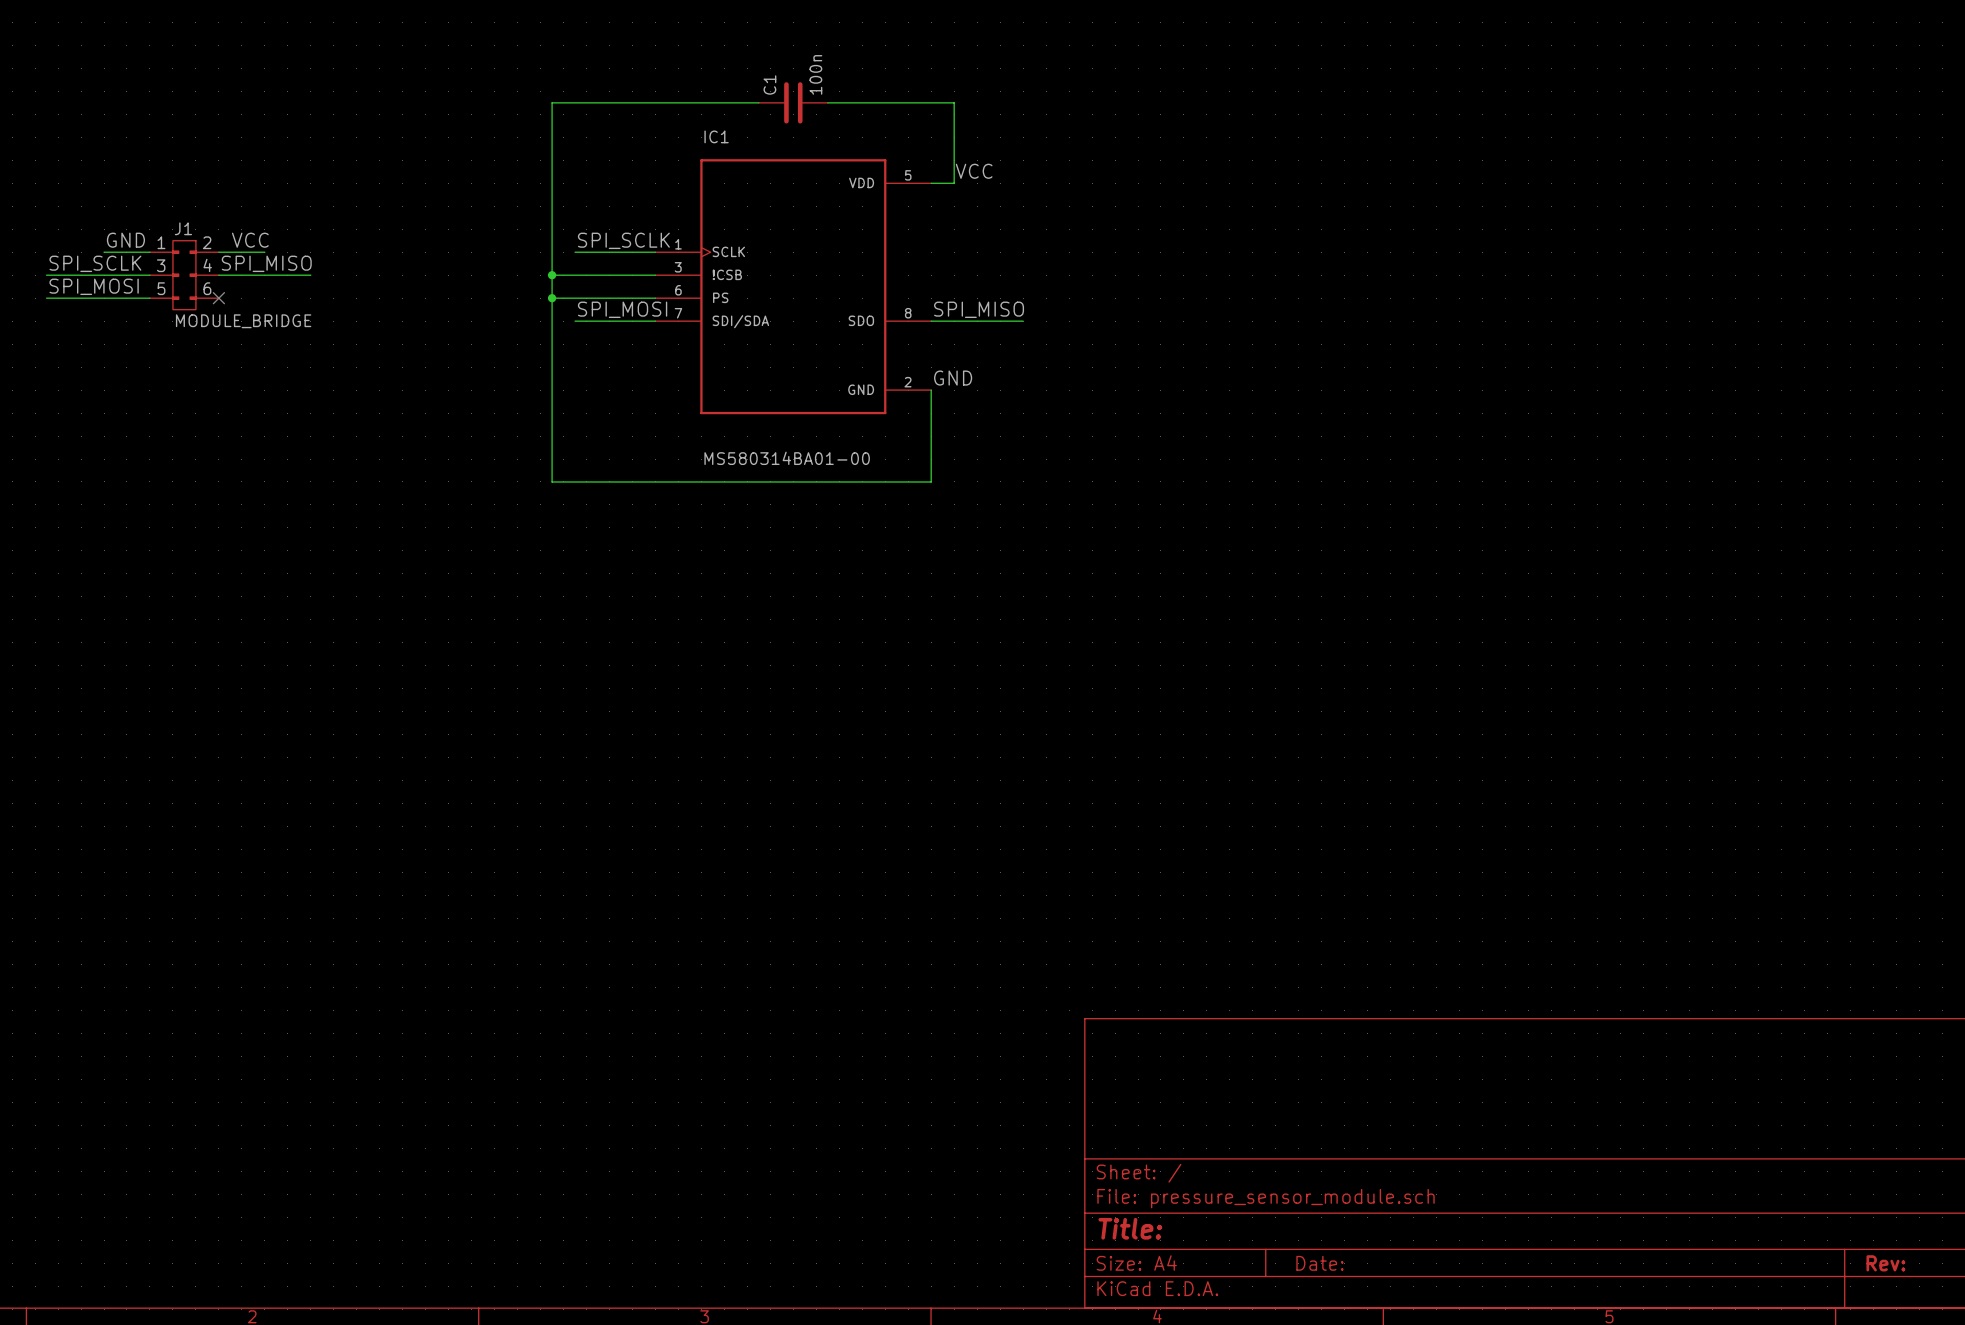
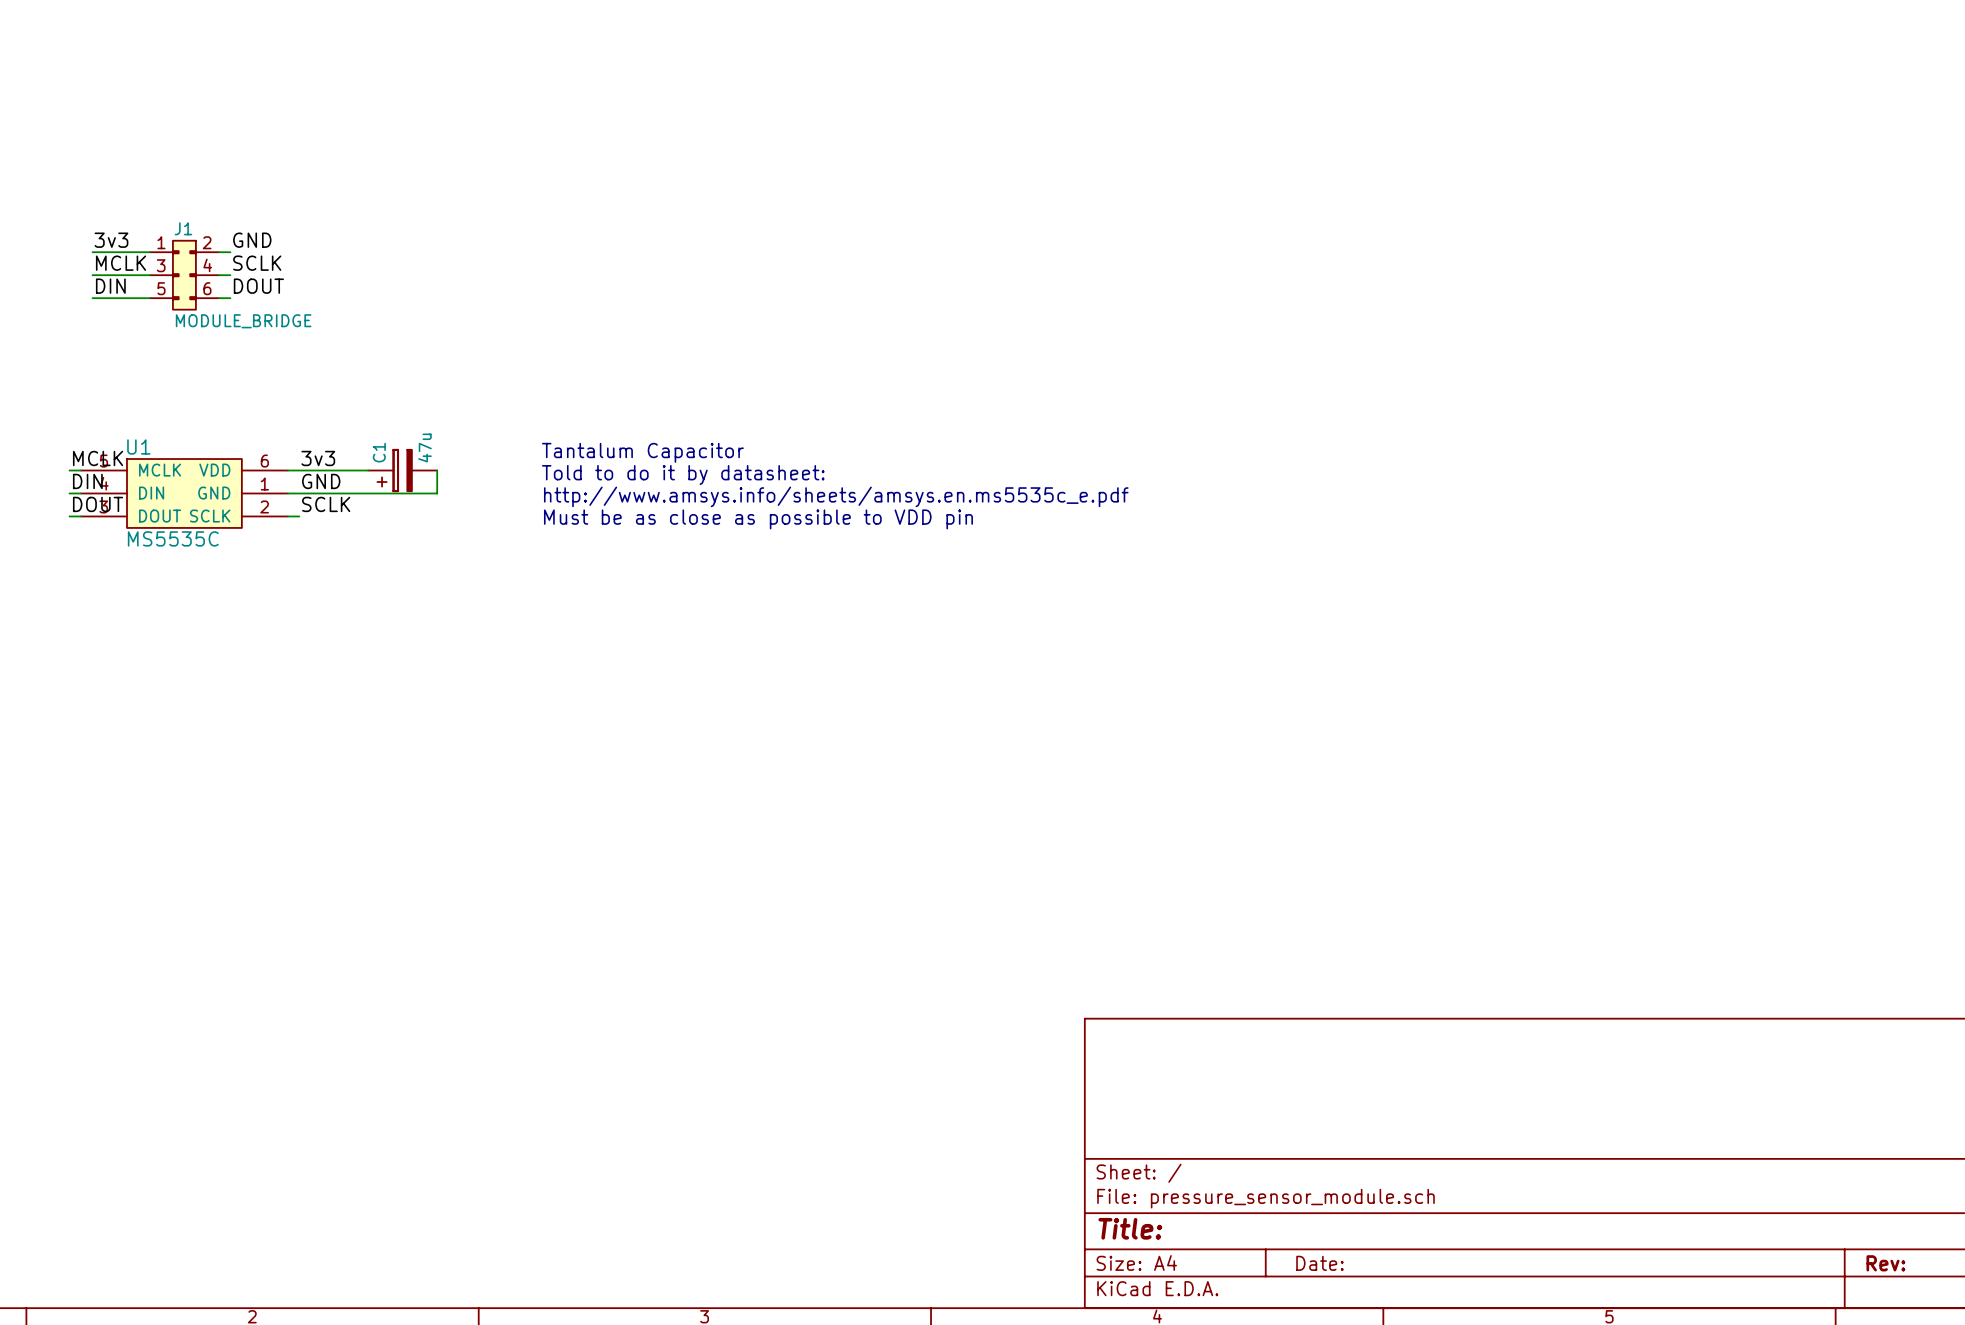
C1 value: 100n (815, 74) -> 47u (425, 447)
C1 symbol: [758, 82, 828, 124] -> [368, 449, 438, 492]
wire: (758, 102) (552, 102) (552, 481) (931, 481) (931, 390) -> none
wire: (827, 102) (954, 102) (954, 183) (931, 183) -> none
label: VCC (974, 171) -> none
label: none -> 3v3 (111, 240)
label: GND (125, 240) -> none
label: VCC (250, 240) -> GND (252, 240)
label: SPI_SCLK (623, 240) -> none
wire: none -> (92, 252) (104, 252)
wire: (230, 252) (264, 252) -> none
wire: (575, 252) (655, 252) -> none
label: SPI_SCLK (95, 263) -> none
label: none -> MCLK (121, 263)
label: none -> SCLK (257, 263)
label: SPI_MISO (266, 263) -> none
wire: (46, 275) (92, 275) -> none
wire: (230, 275) (310, 275) -> (287, 470) (368, 470)
wire: (552, 275) (655, 275) -> none
junction: (552, 275) -> none
label: SPI_MOSI (94, 286) -> none
label: none -> DIN (110, 286)
label: none -> DOUT (258, 286)
IC1: MS580314BA01-00 (793, 286) -> none
wire: (46, 298) (92, 298) -> none
wire: none -> (218, 298) (230, 298)
no-connect mark: (218, 298) -> none
wire: (552, 298) (655, 298) -> none
junction: (552, 298) -> none
label: SPI_MOSI (622, 309) -> none
label: SPI_MISO (979, 309) -> none
wire: (575, 321) (655, 321) -> none
wire: (931, 321) (1023, 321) -> none
label: GND (953, 378) -> none
text: none -> Tantalum Capacitor (642, 452)
label: none -> MCLK (98, 458)
label: none -> 3v3 (318, 458)
wire: none -> (69, 470) (81, 470)
wire: none -> (437, 470) (437, 493) (287, 493)
text: none -> Told to do it by datasheet: (683, 475)
label: none -> DIN (87, 481)
label: none -> GND (321, 481)
wire: none -> (69, 493) (81, 493)
U1: none -> MS5535C (184, 493)
text: none -> http://www.amsys.info/sheets/amsys.en.ms5535c_e.pdf (836, 496)
label: none -> DOUT (98, 504)
label: none -> SCLK (326, 504)
wire: none -> (69, 516) (81, 516)
wire: none -> (287, 516) (299, 516)
text: none -> Must be as close as possible to VDD pin (758, 519)

